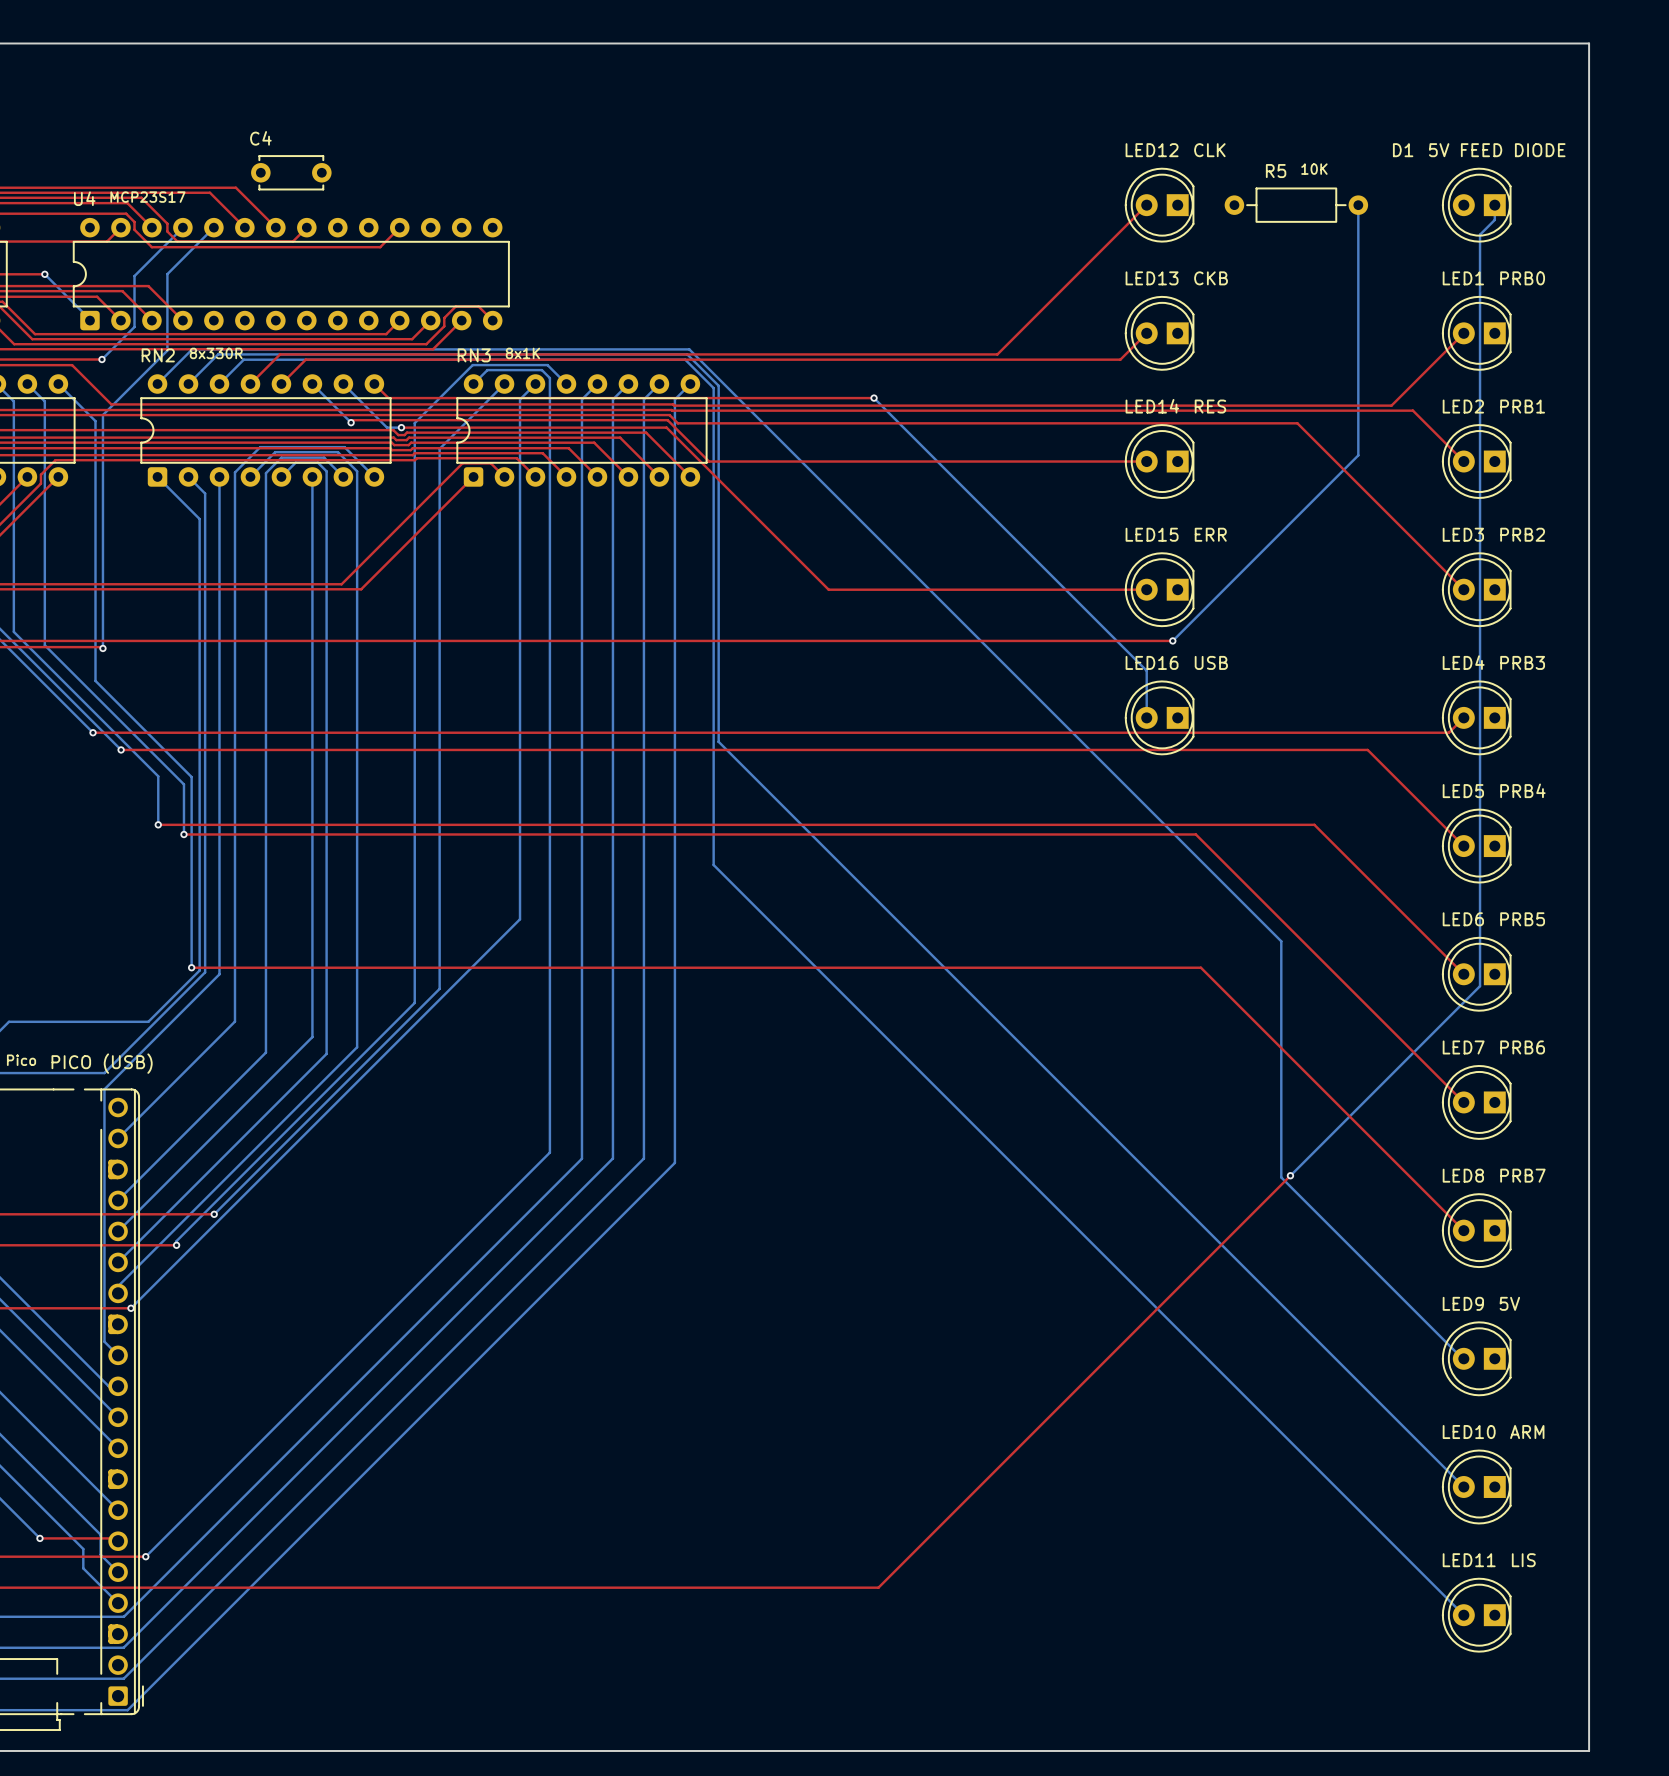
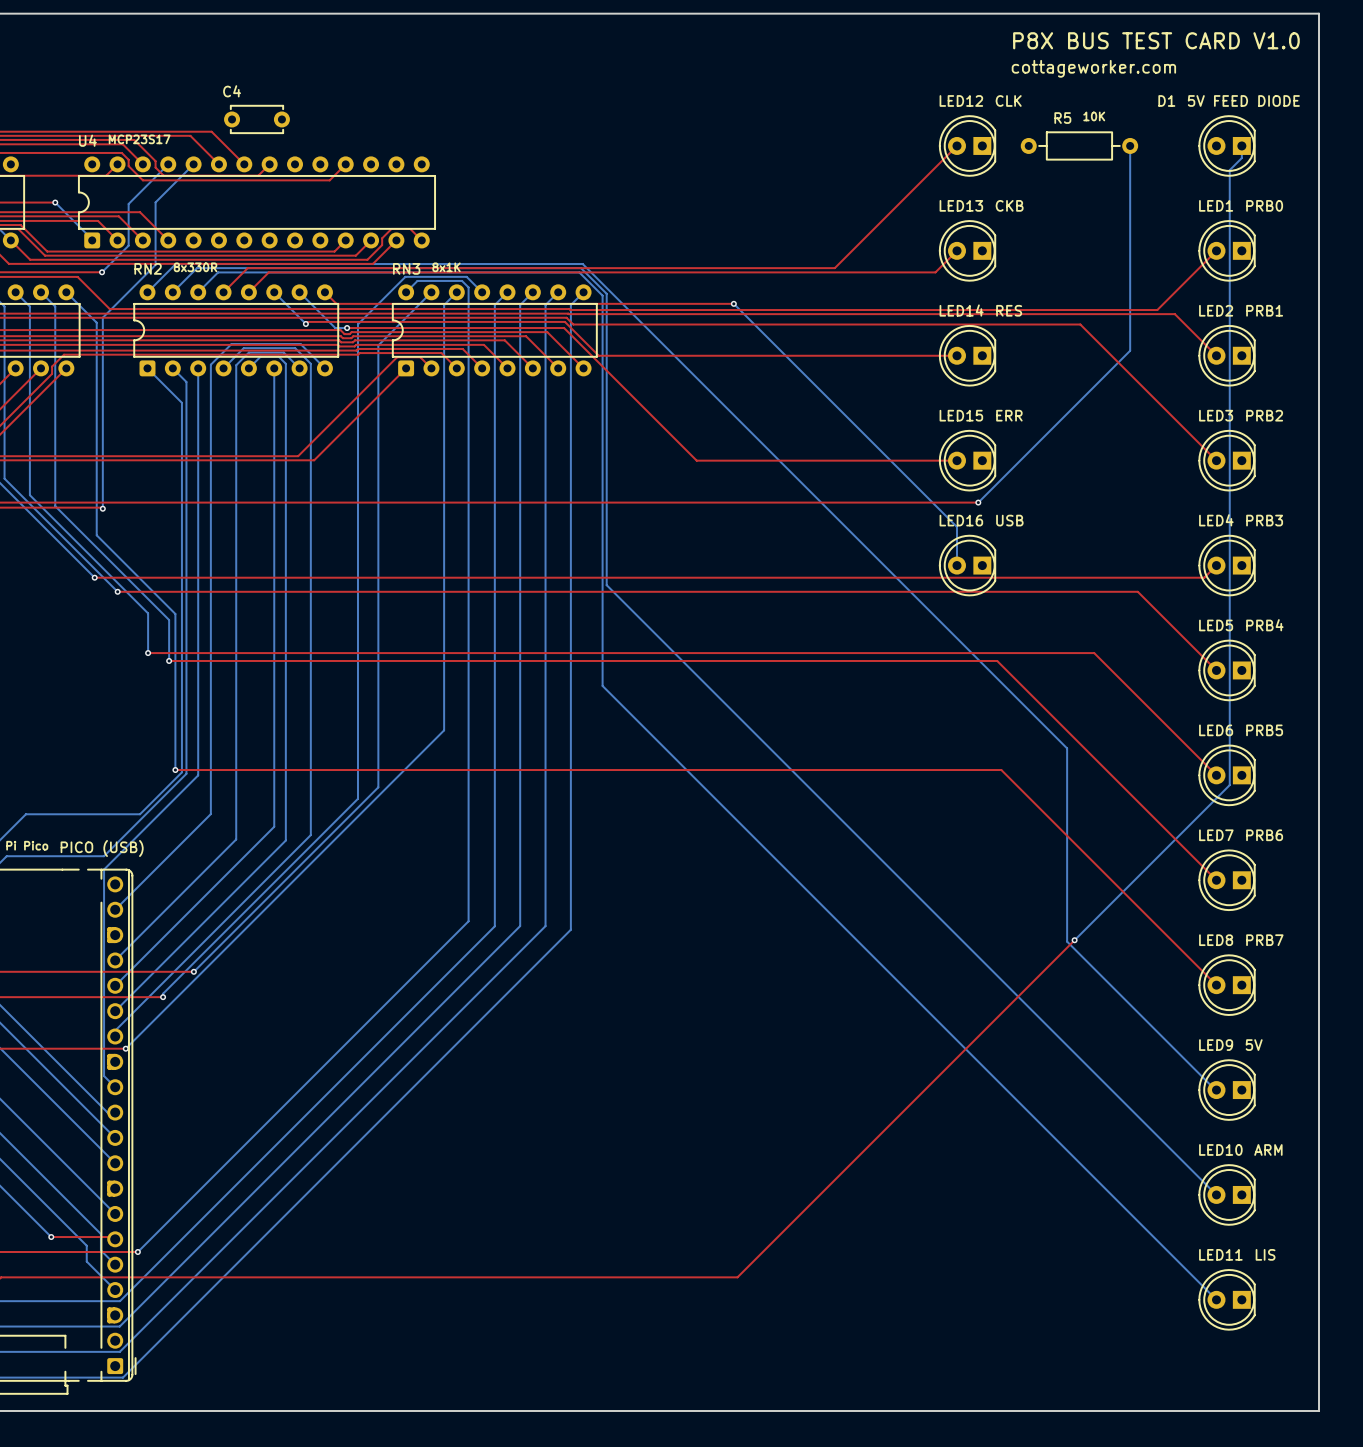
text: none -> P8X BUS TEST CARD V1.0 (1156, 40)
text: none -> cottageworker.com (1093, 68)

